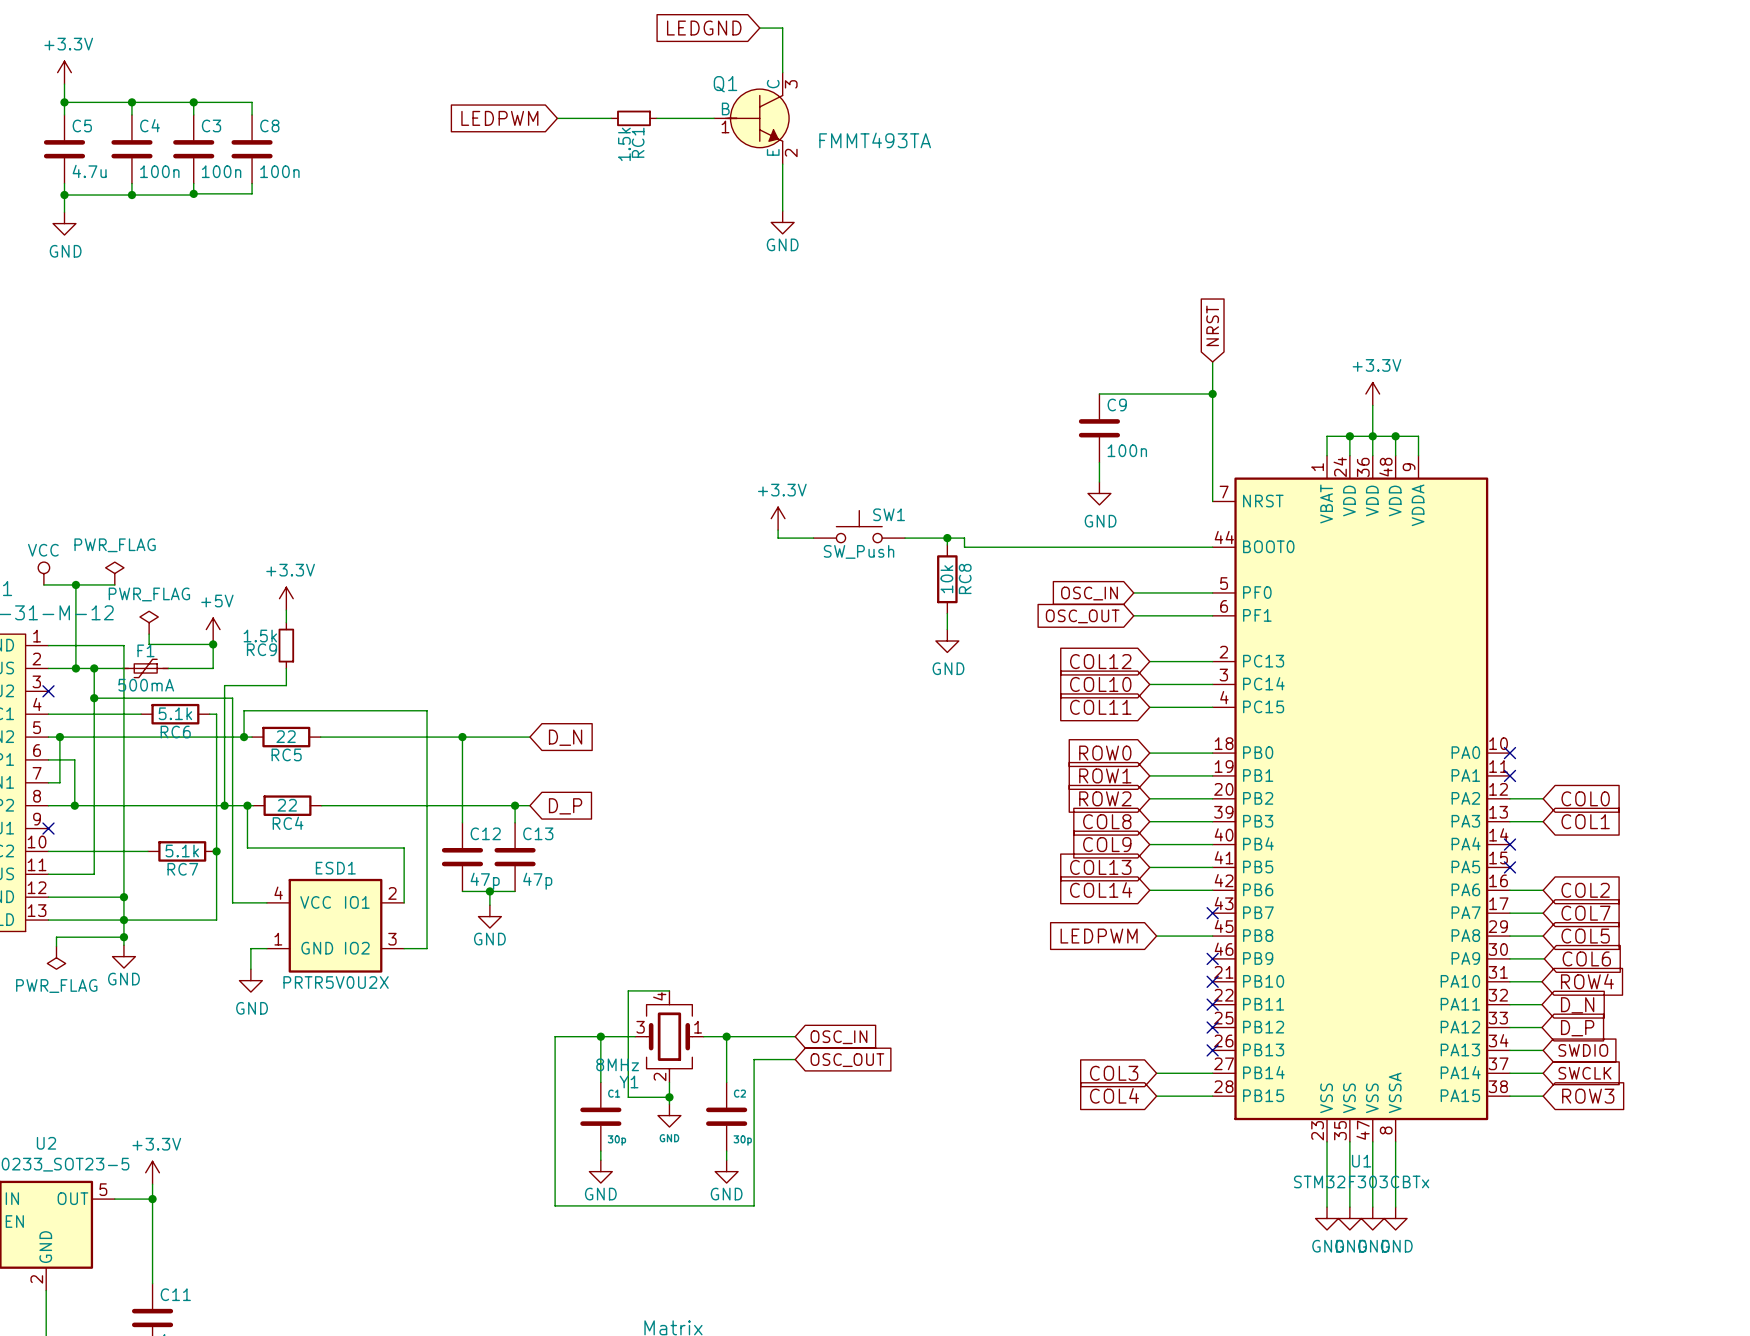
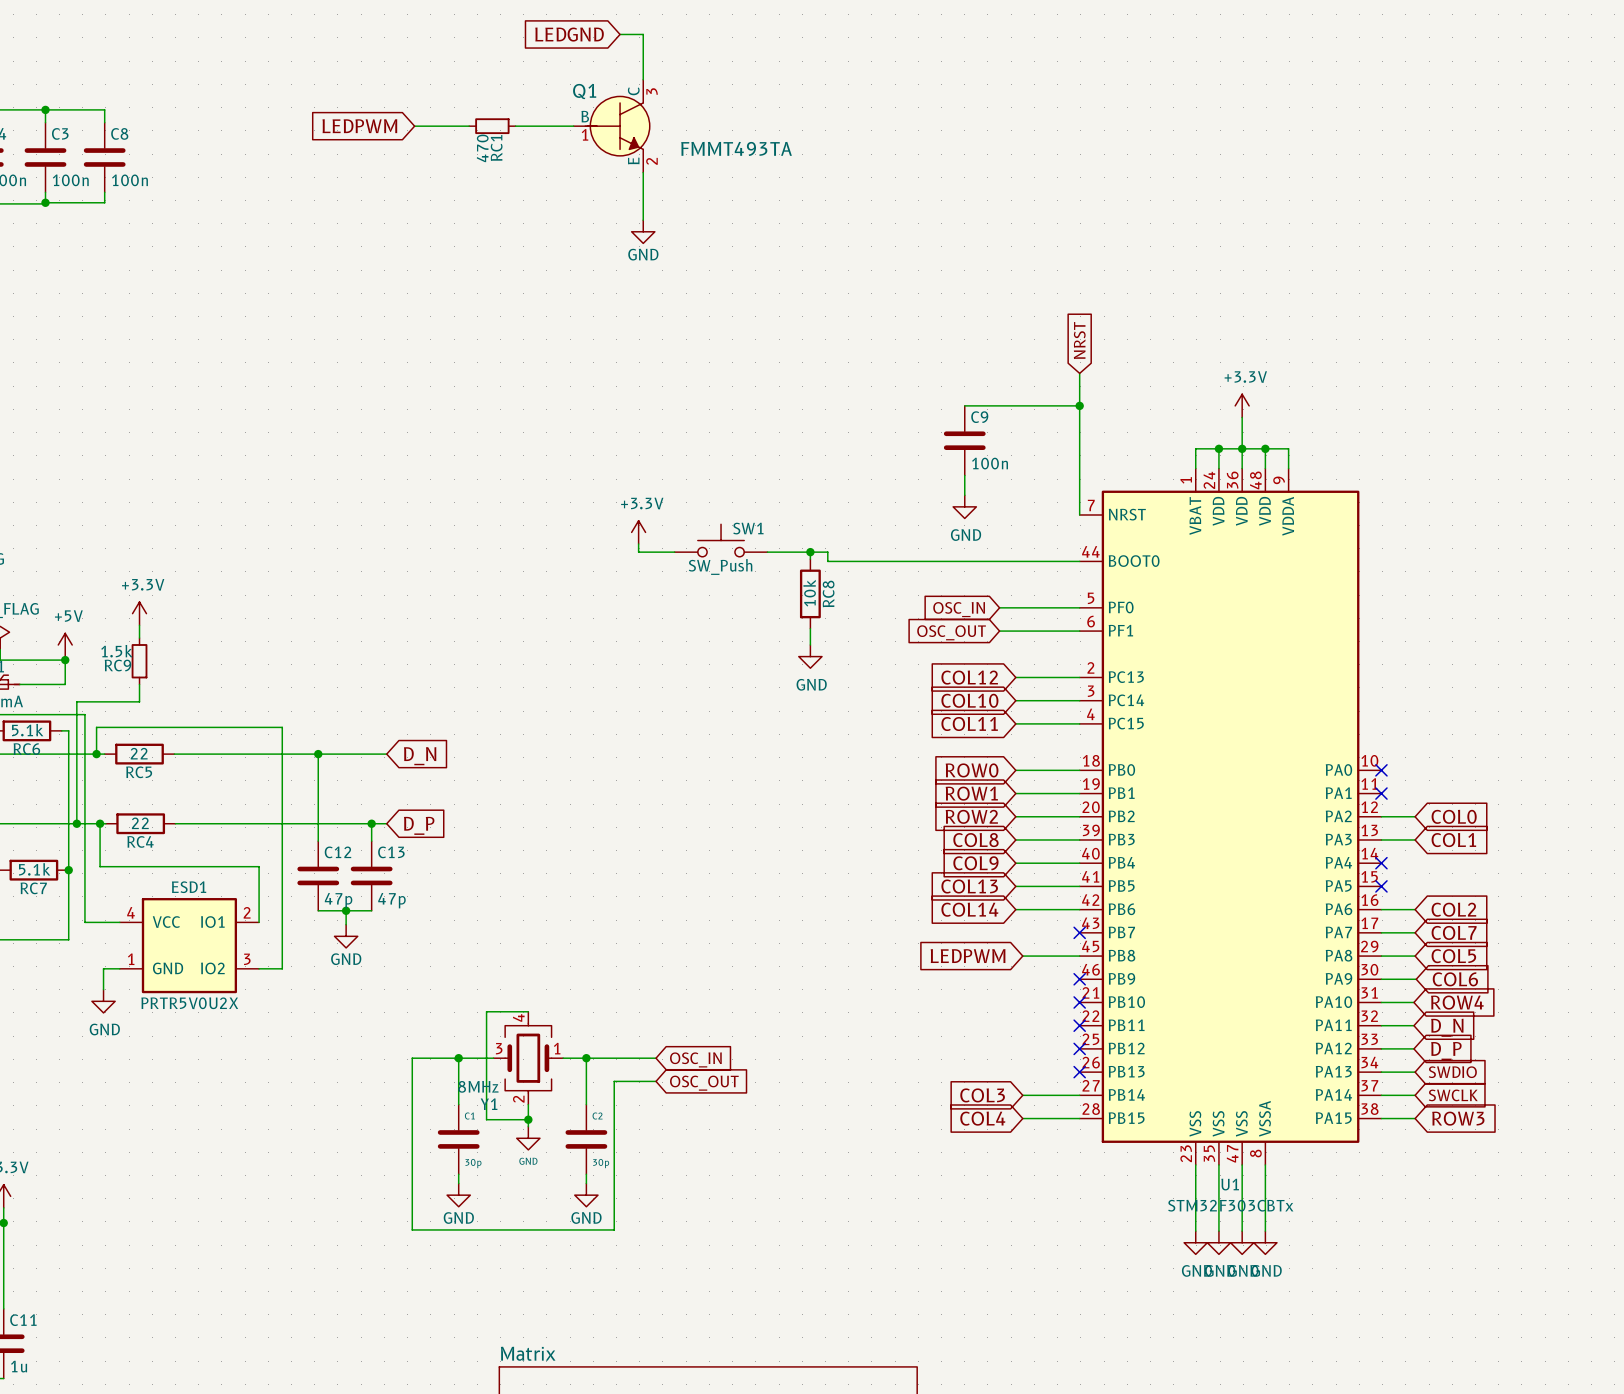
RC1 value: 1.5k (624, 144) -> 470 (482, 148)

